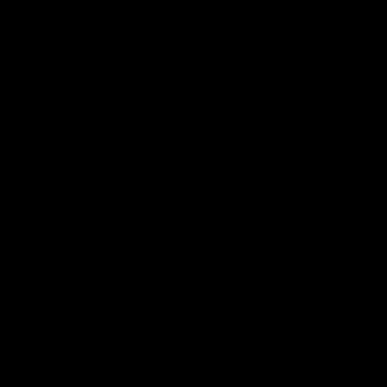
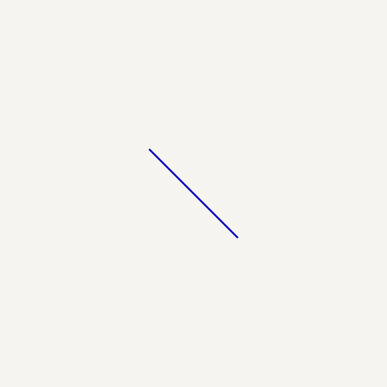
bus: none -> (149, 149) (237, 237)

